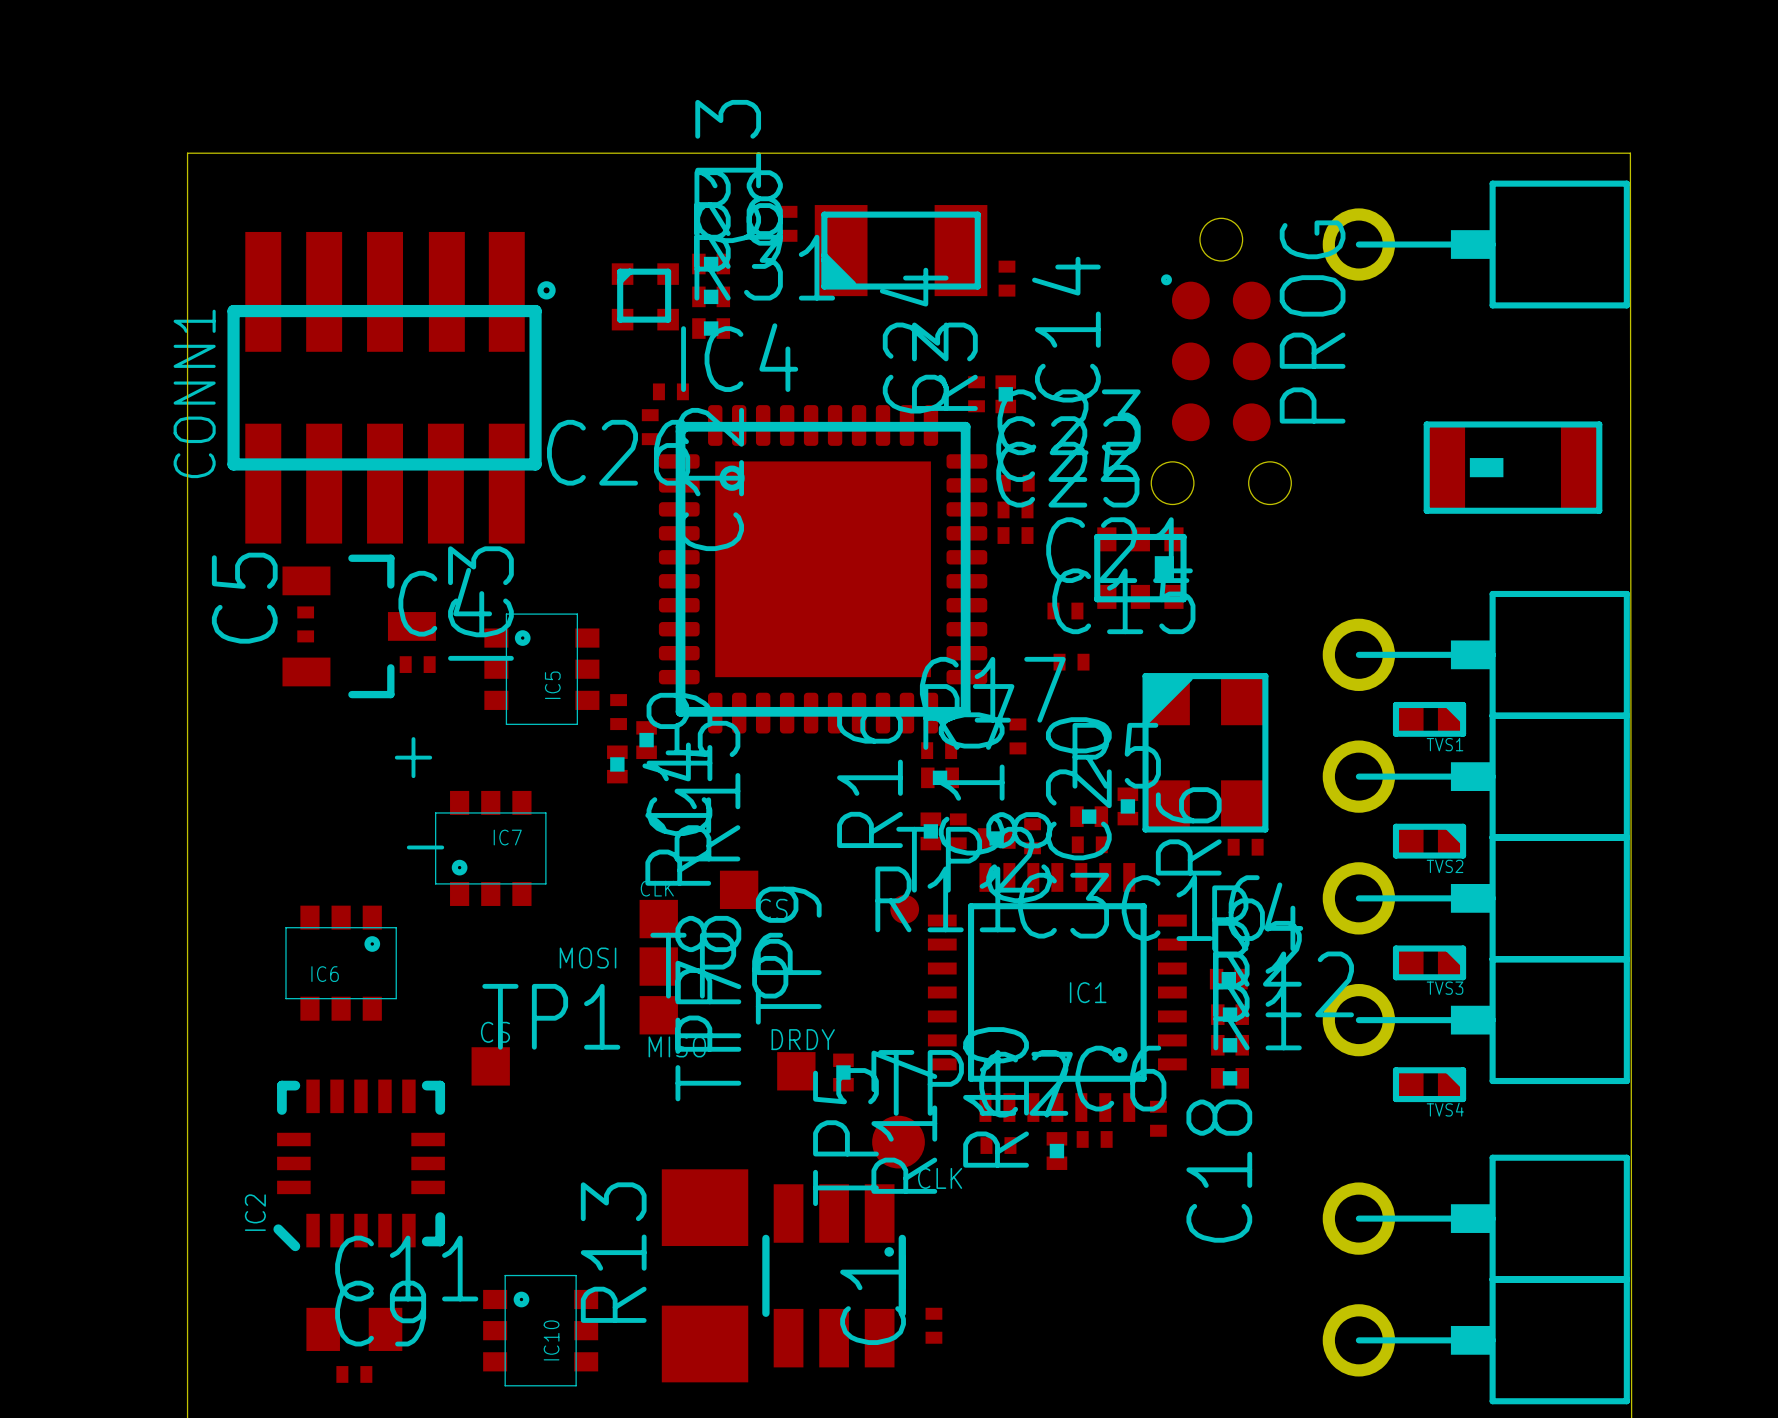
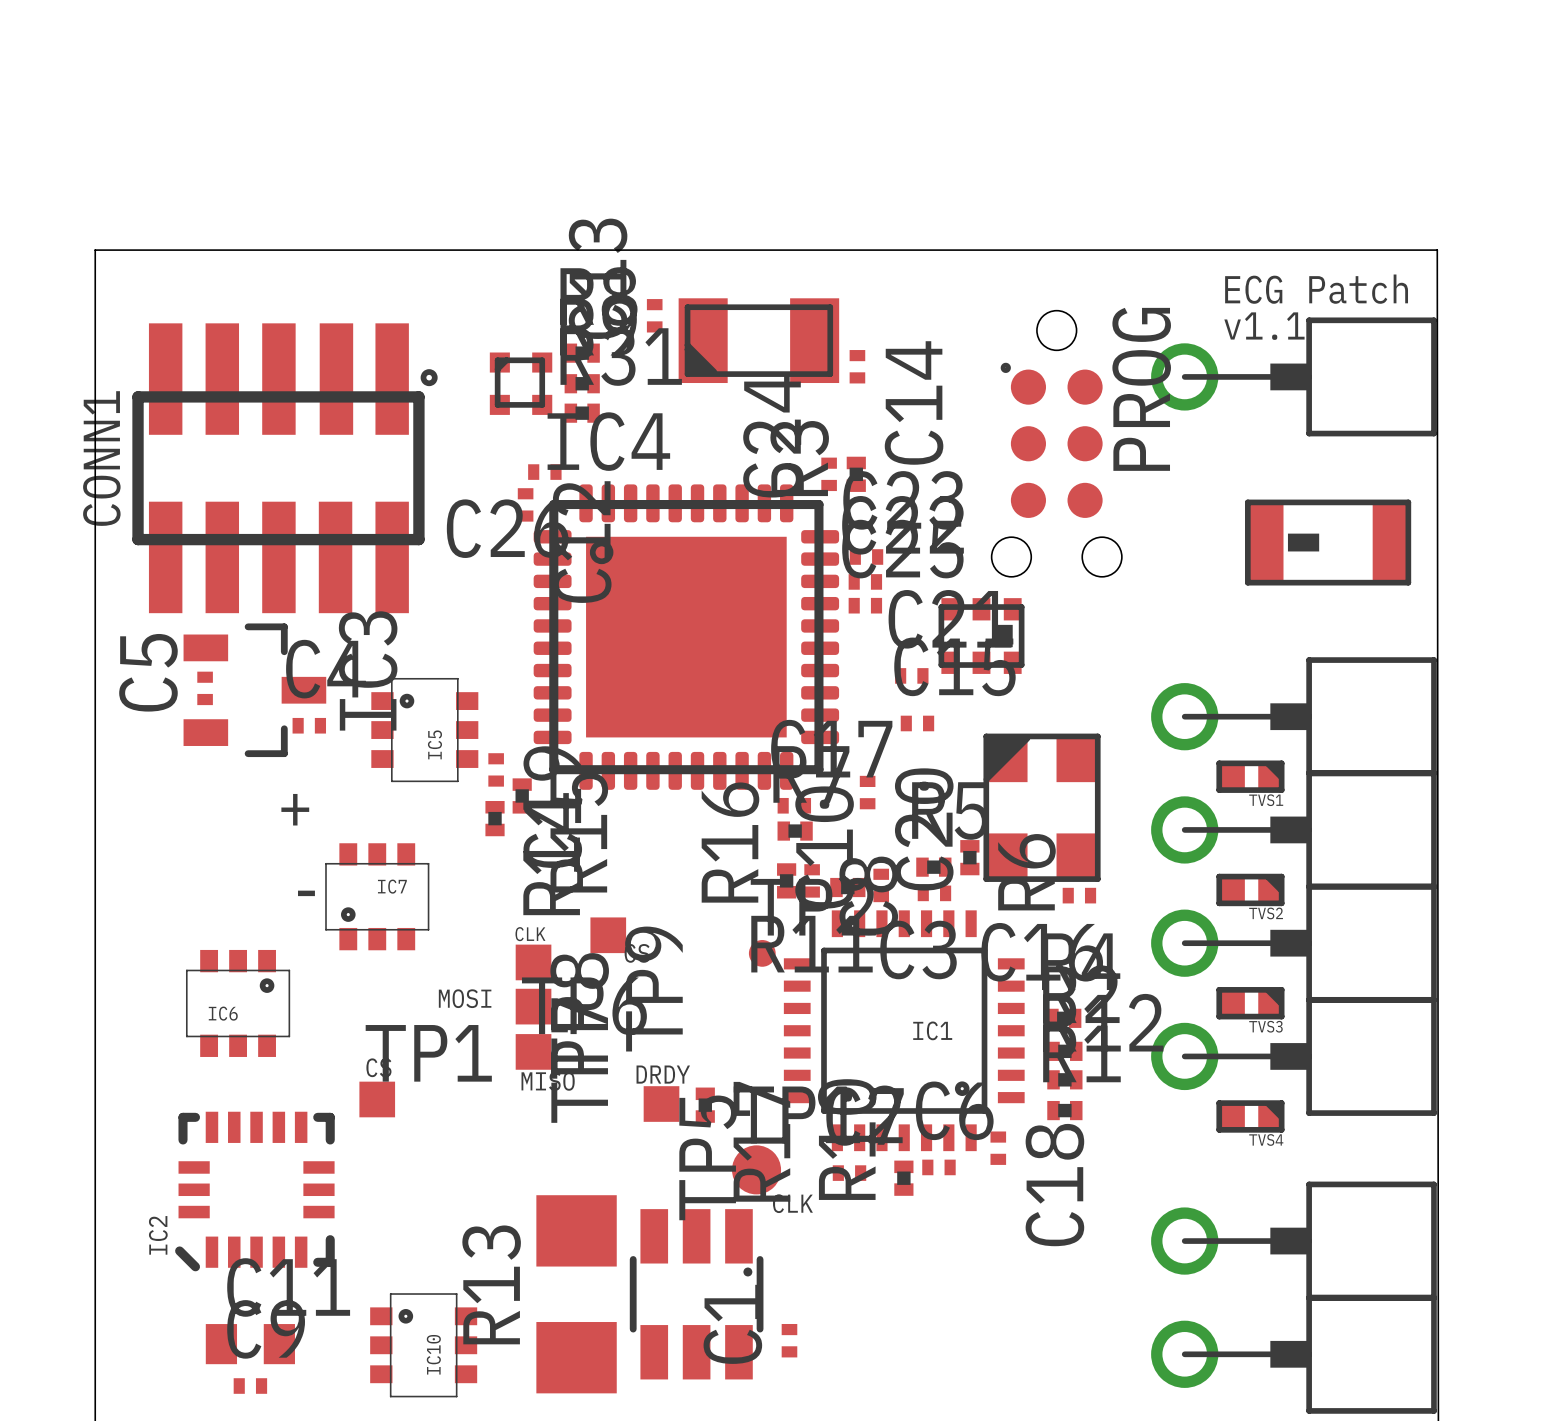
text: none -> ECG Patch (1316, 289)
text: none -> v1.1 (1264, 326)
part position: (1476, 244) -> (1293, 376)

